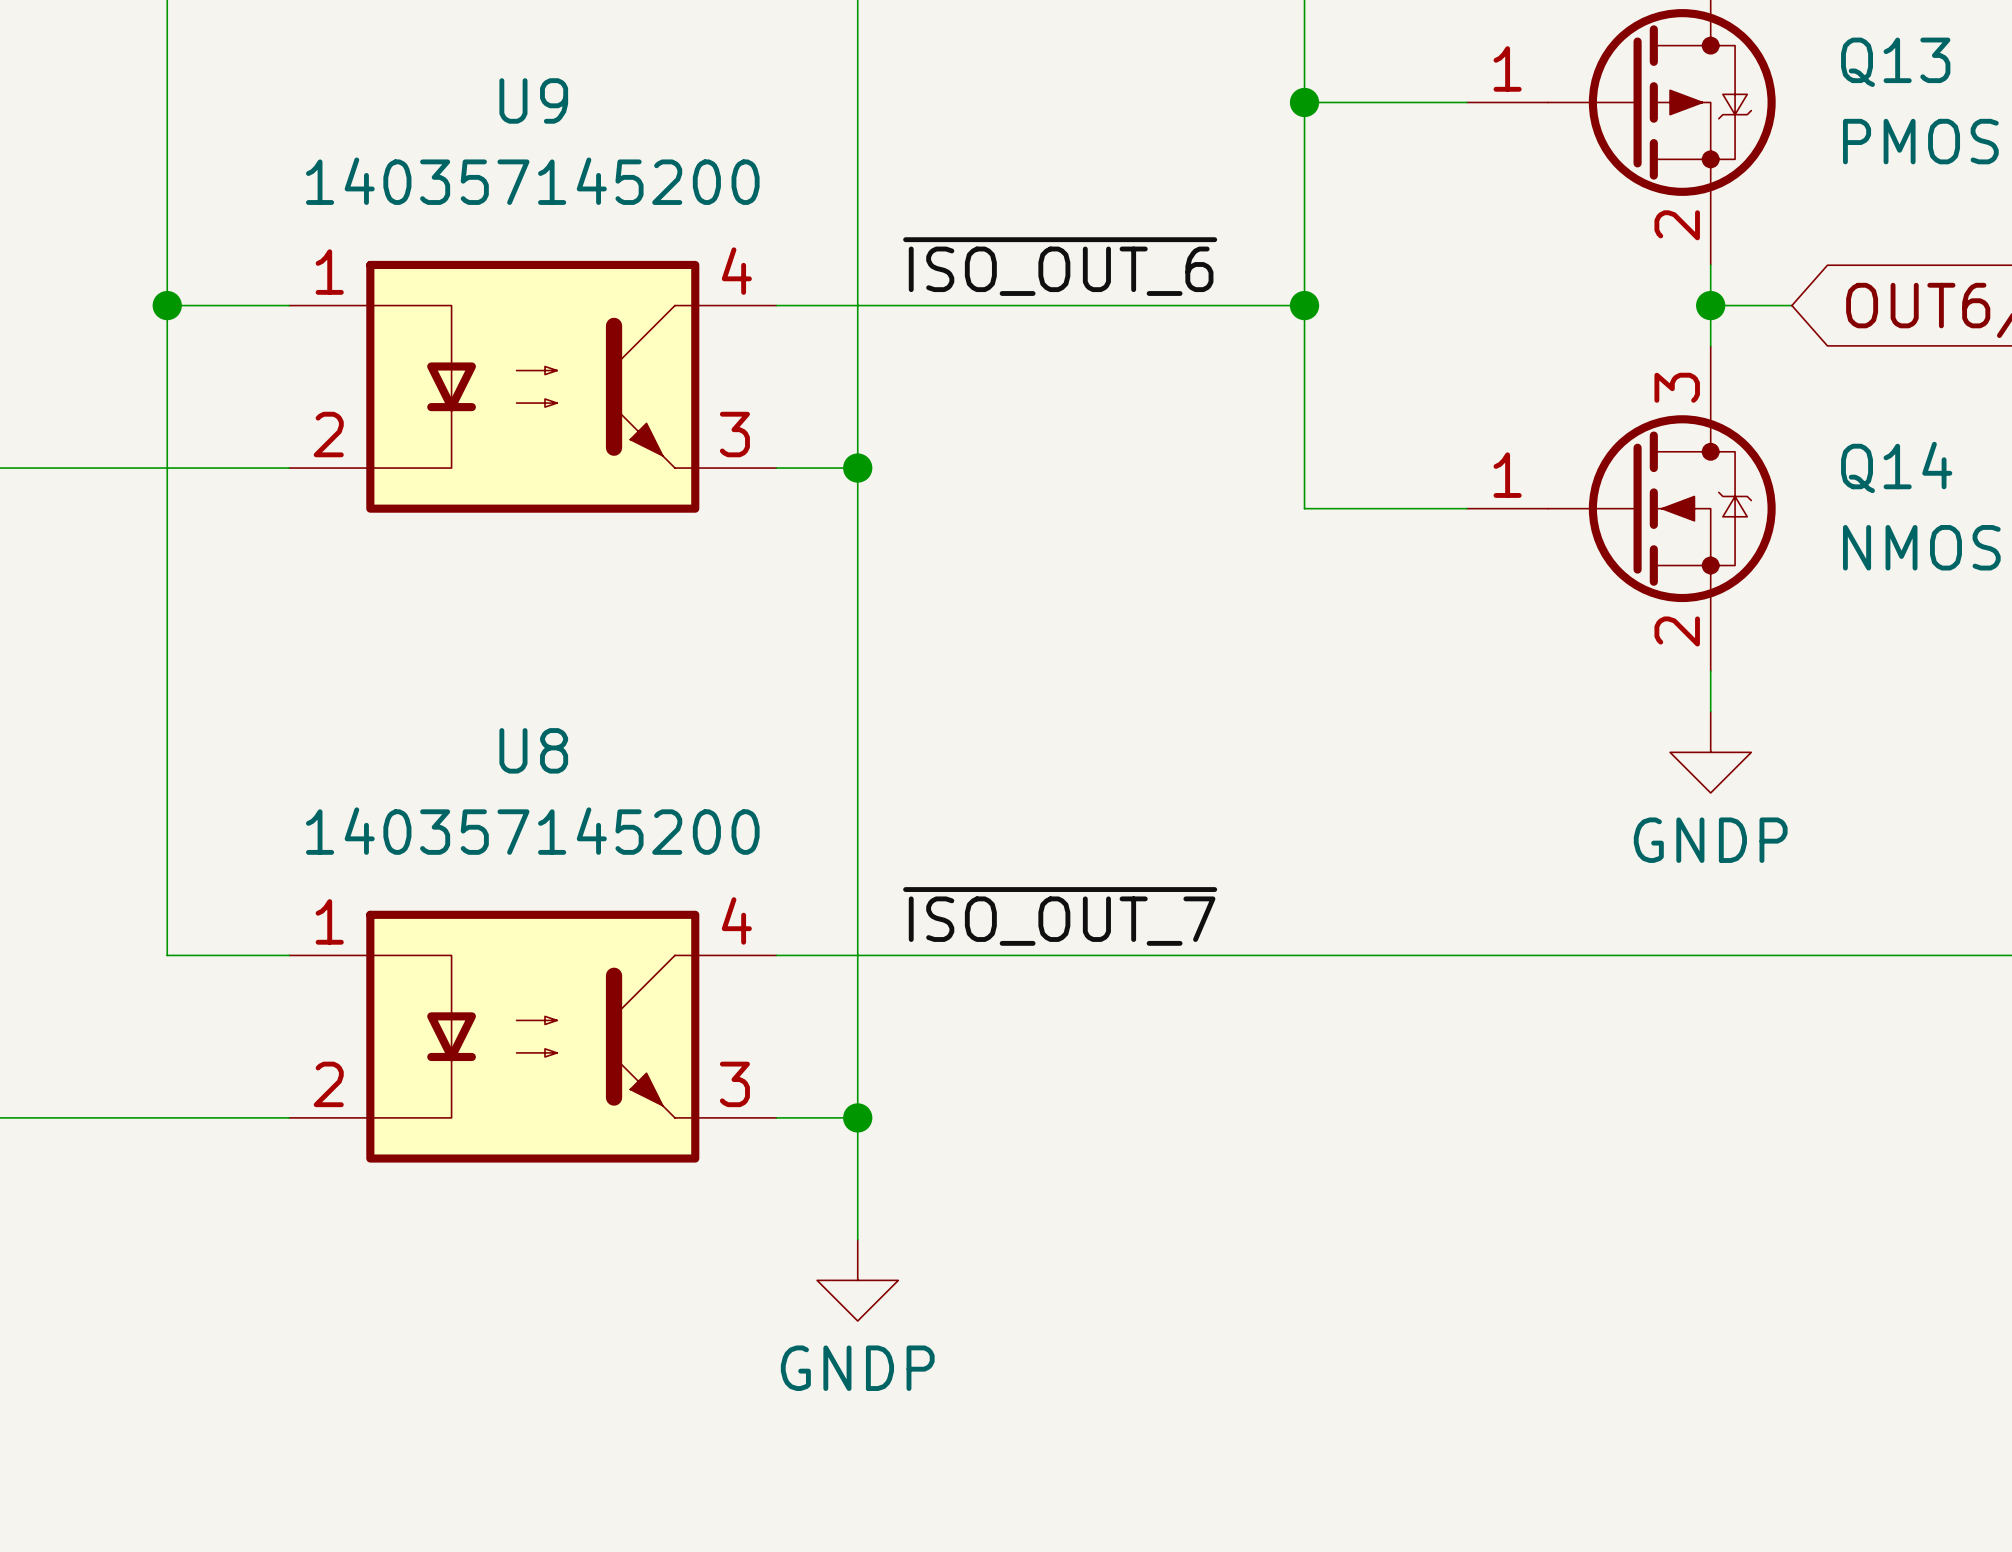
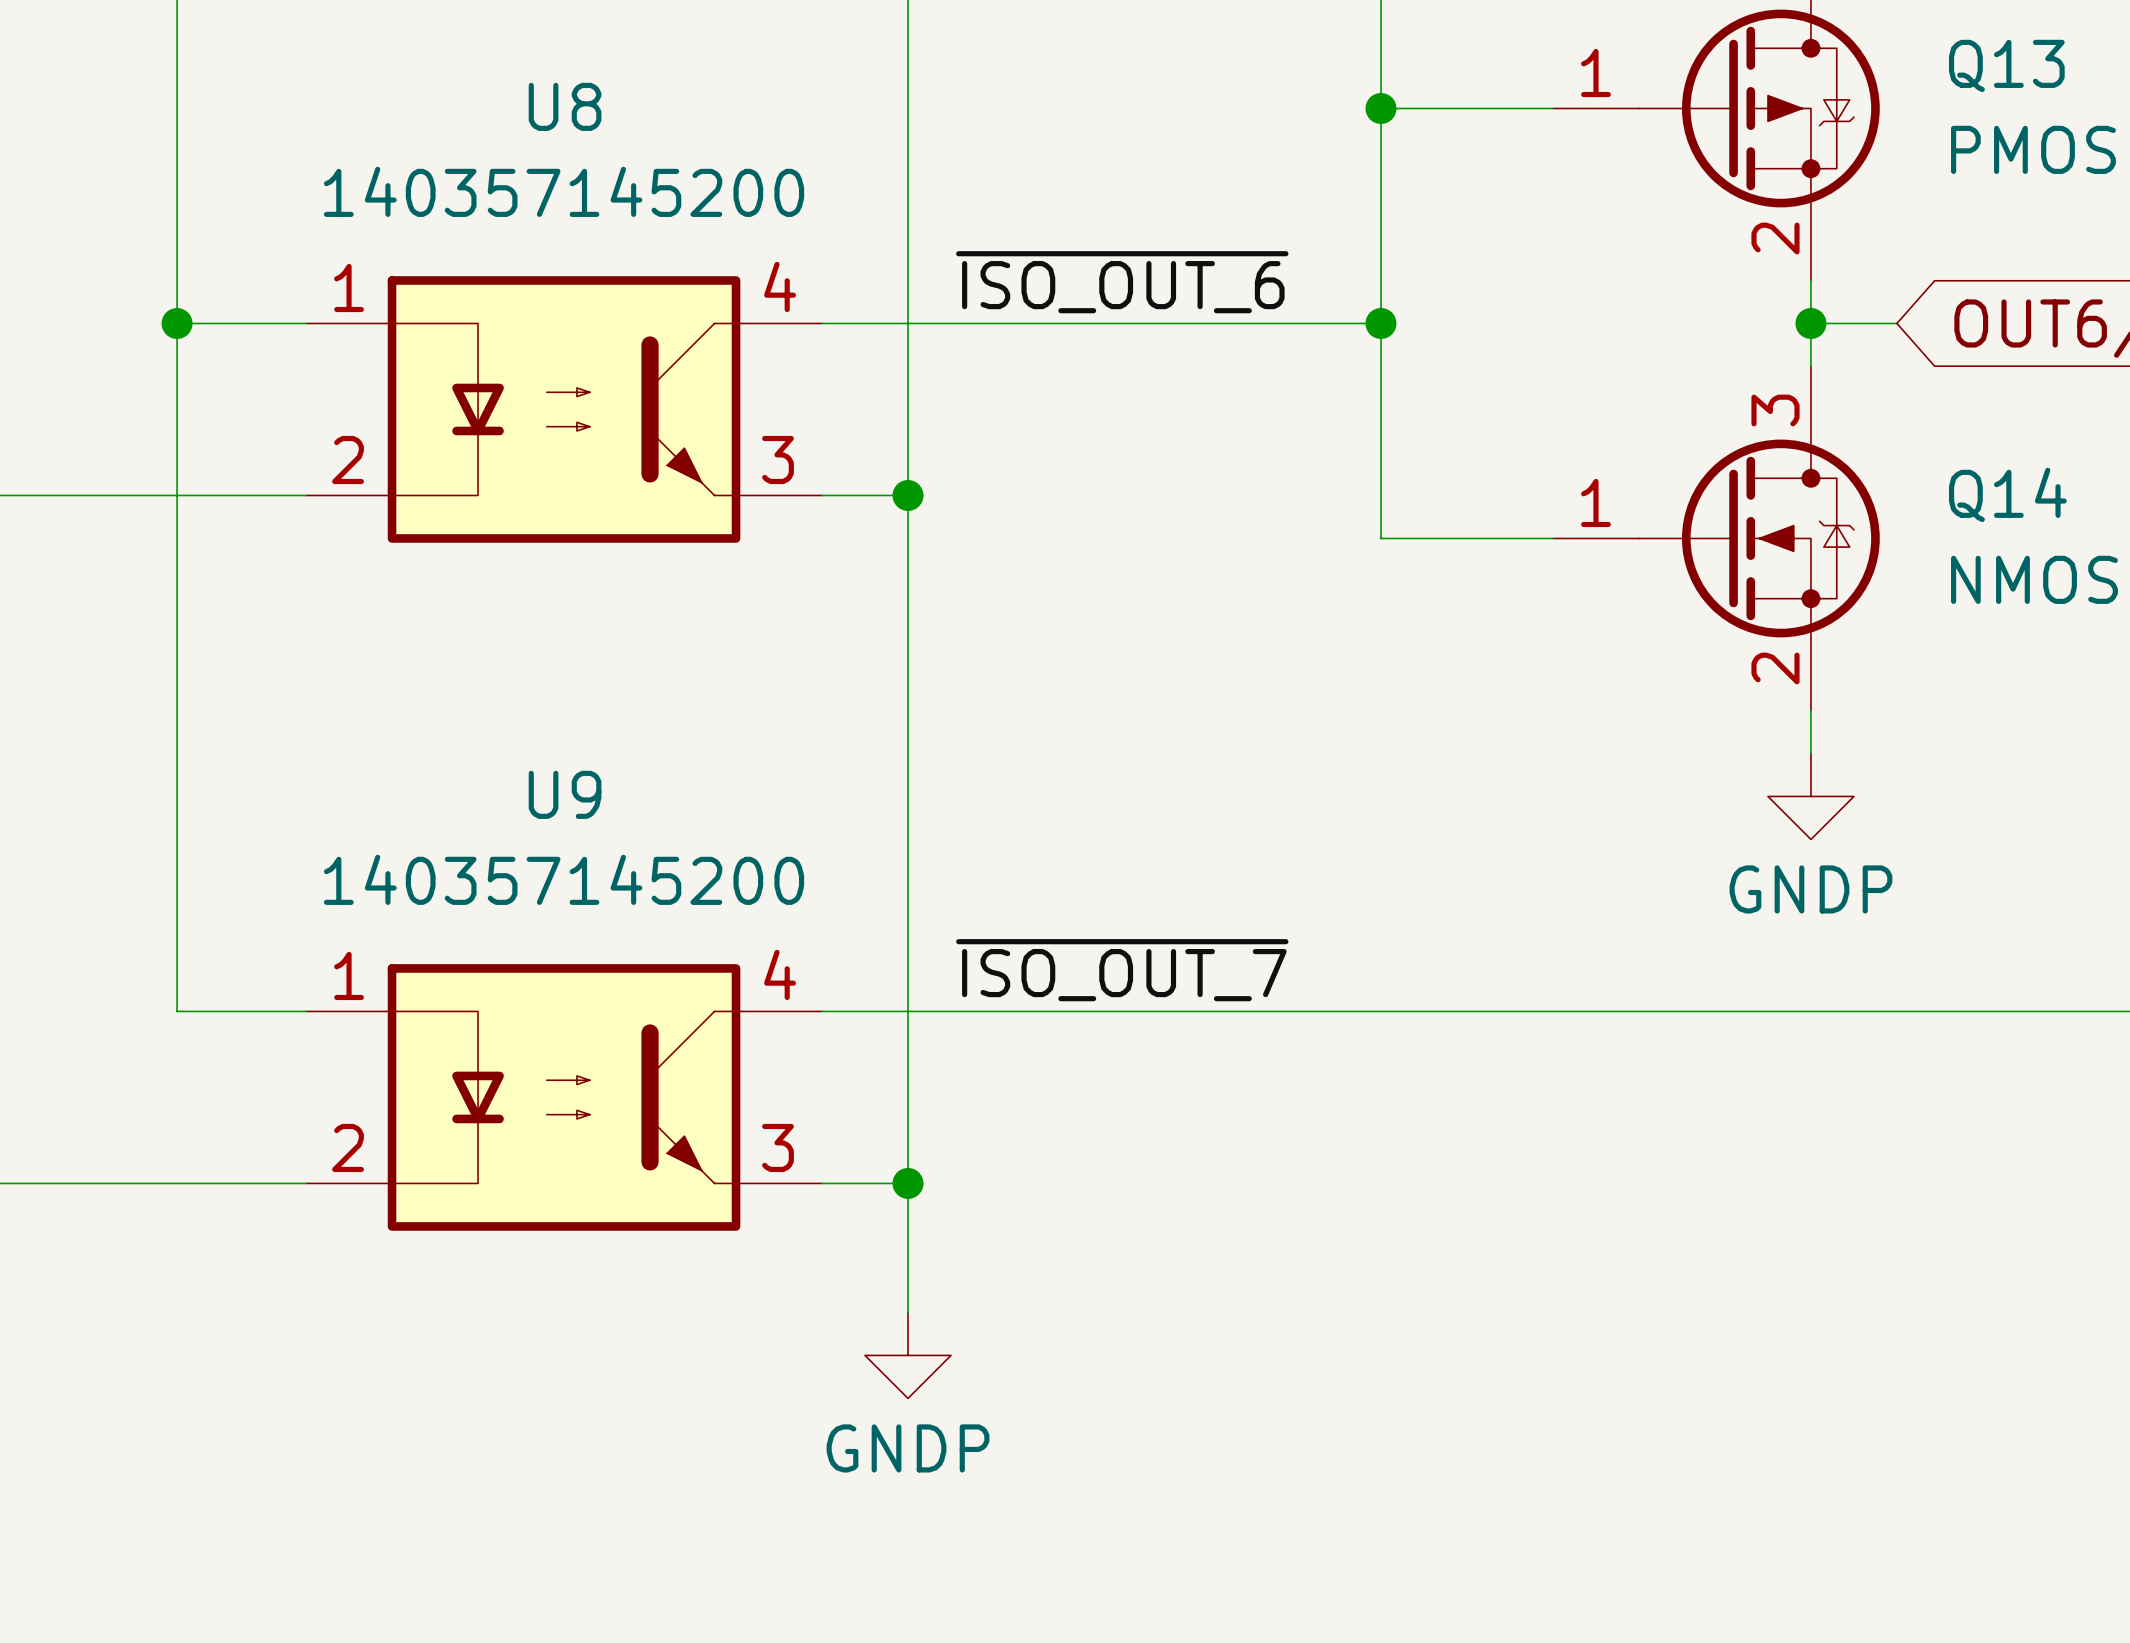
U9 name: U9 (533, 100) -> U8 (565, 106)
U8 name: U8 (533, 750) -> U9 (565, 794)

